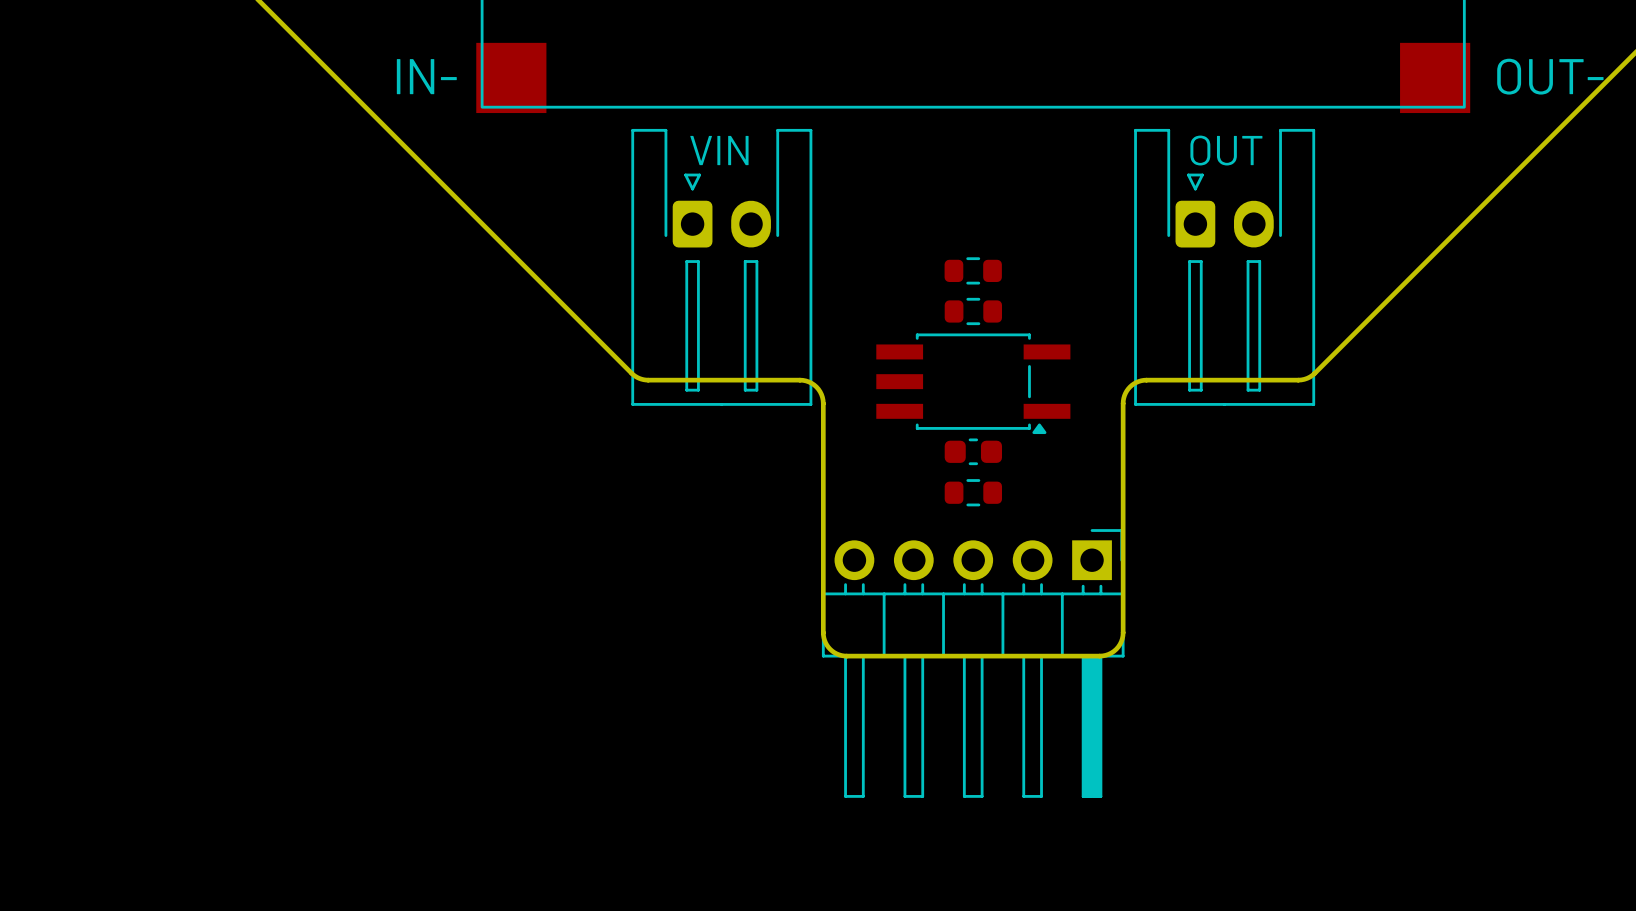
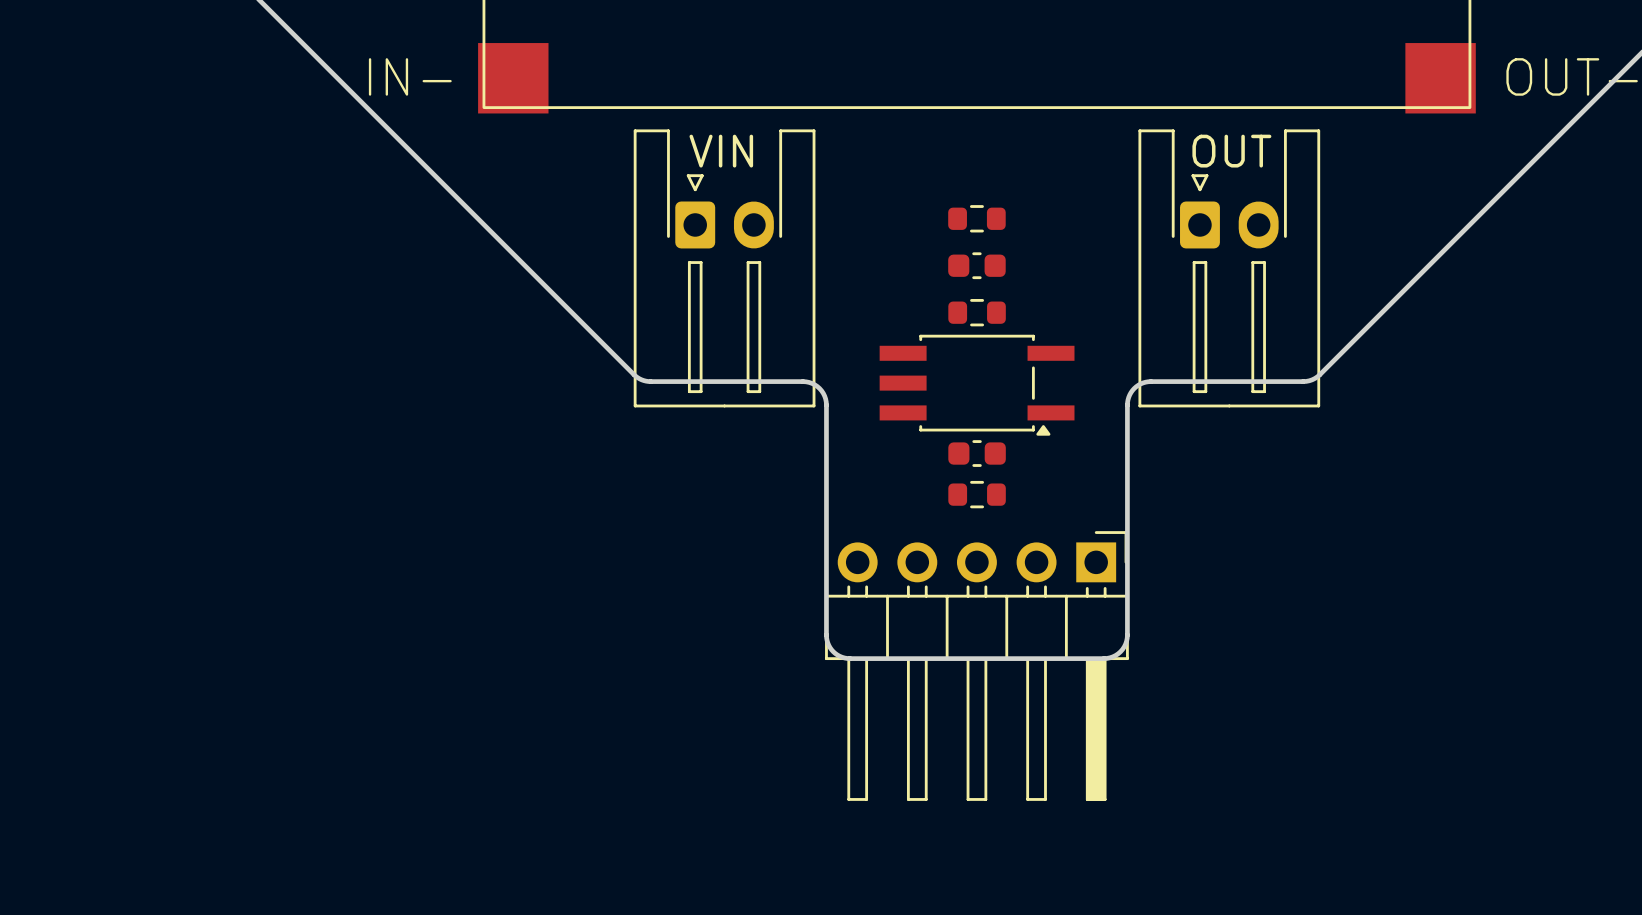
part: none -> (976, 218)
part footprint: [944, 257, 1002, 285] -> [948, 252, 1006, 280]

